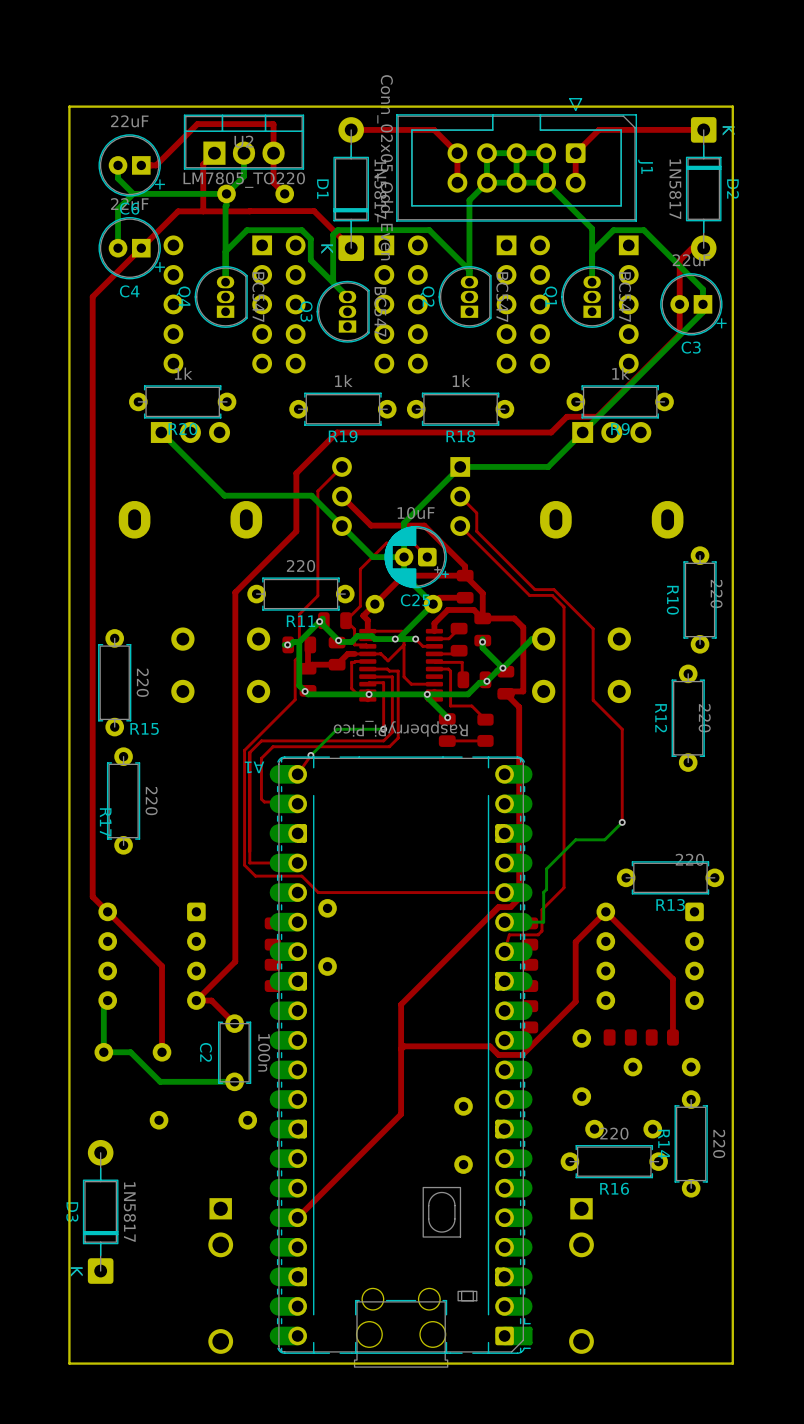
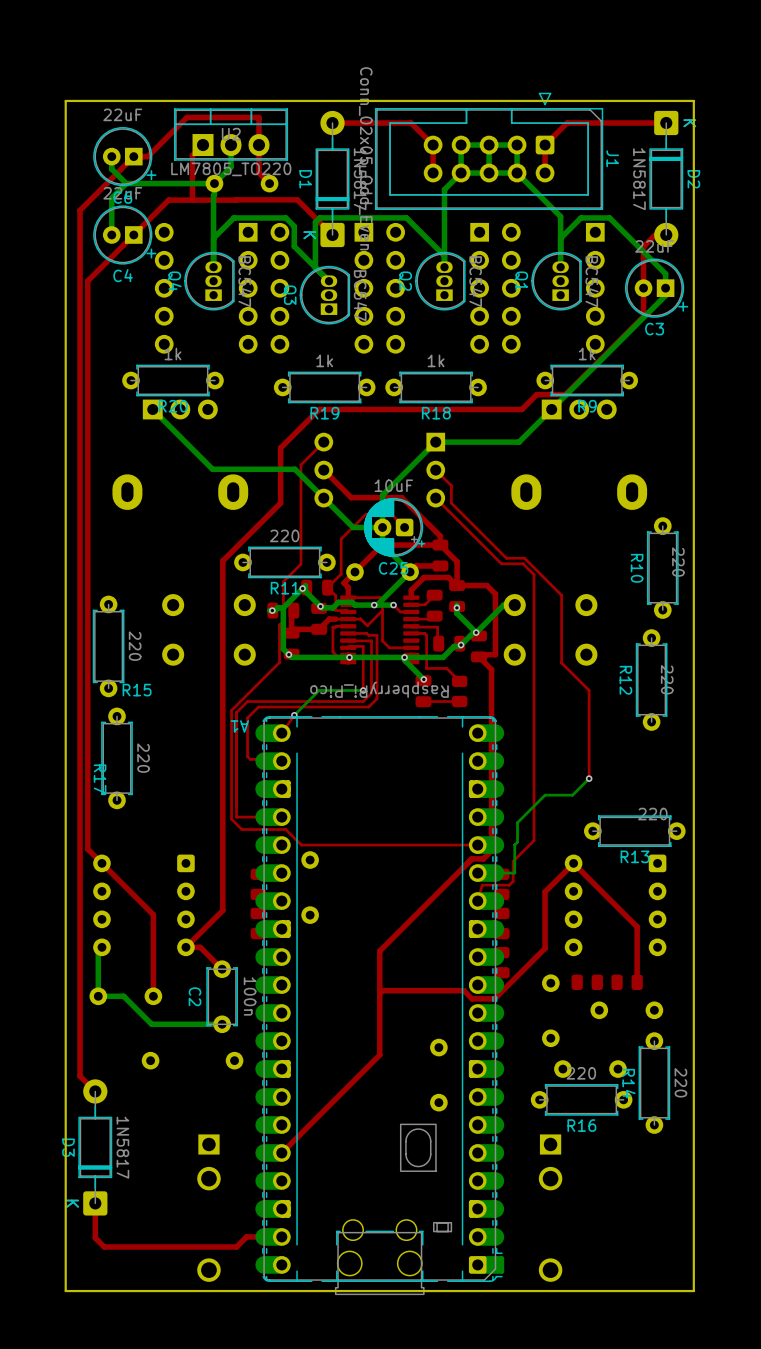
top track: none -> (133, 156) (80, 210) (80, 1076) (95, 1091)
top track: none -> (95, 1203) (95, 1237) (104, 1246) (236, 1246) (246, 1236) (281, 1236)

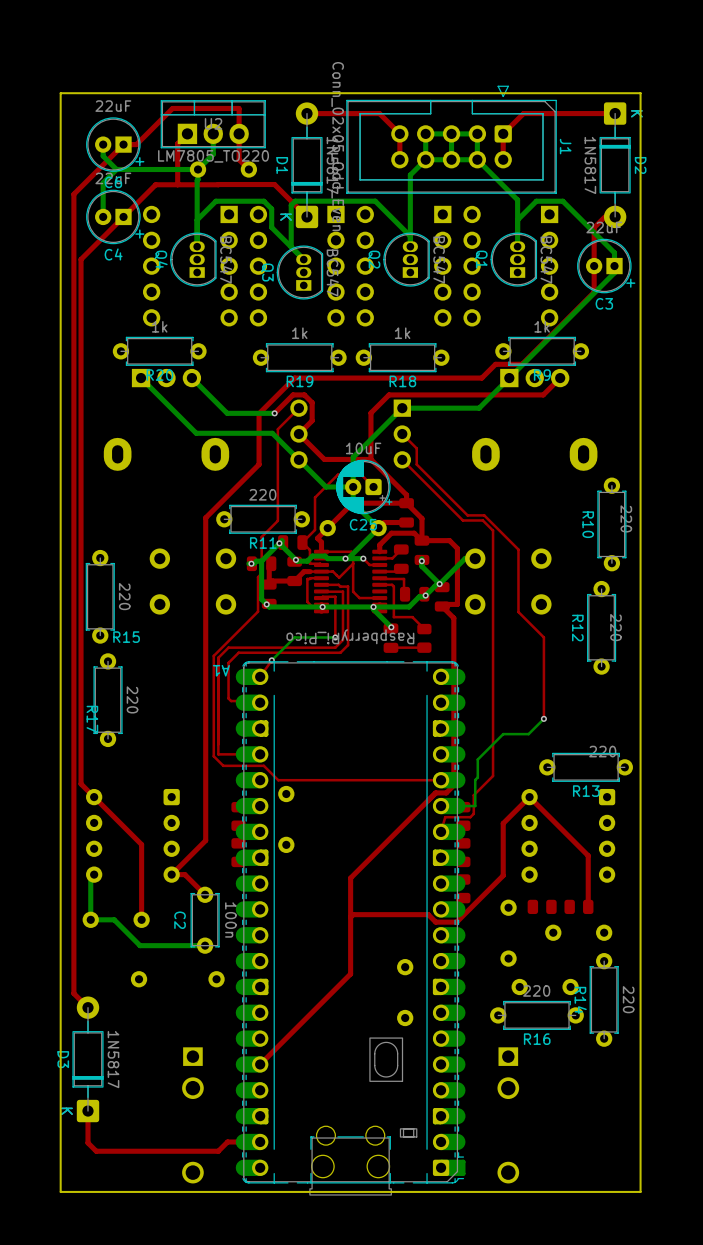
bottom track: none -> (191, 378) (227, 413) (274, 413)
top track: none -> (560, 378) (543, 394) (389, 394) (370, 413) (370, 459)
top track: none -> (274, 413) (293, 394) (304, 394) (312, 402) (312, 420) (298, 434)
via: none -> (274, 413)

